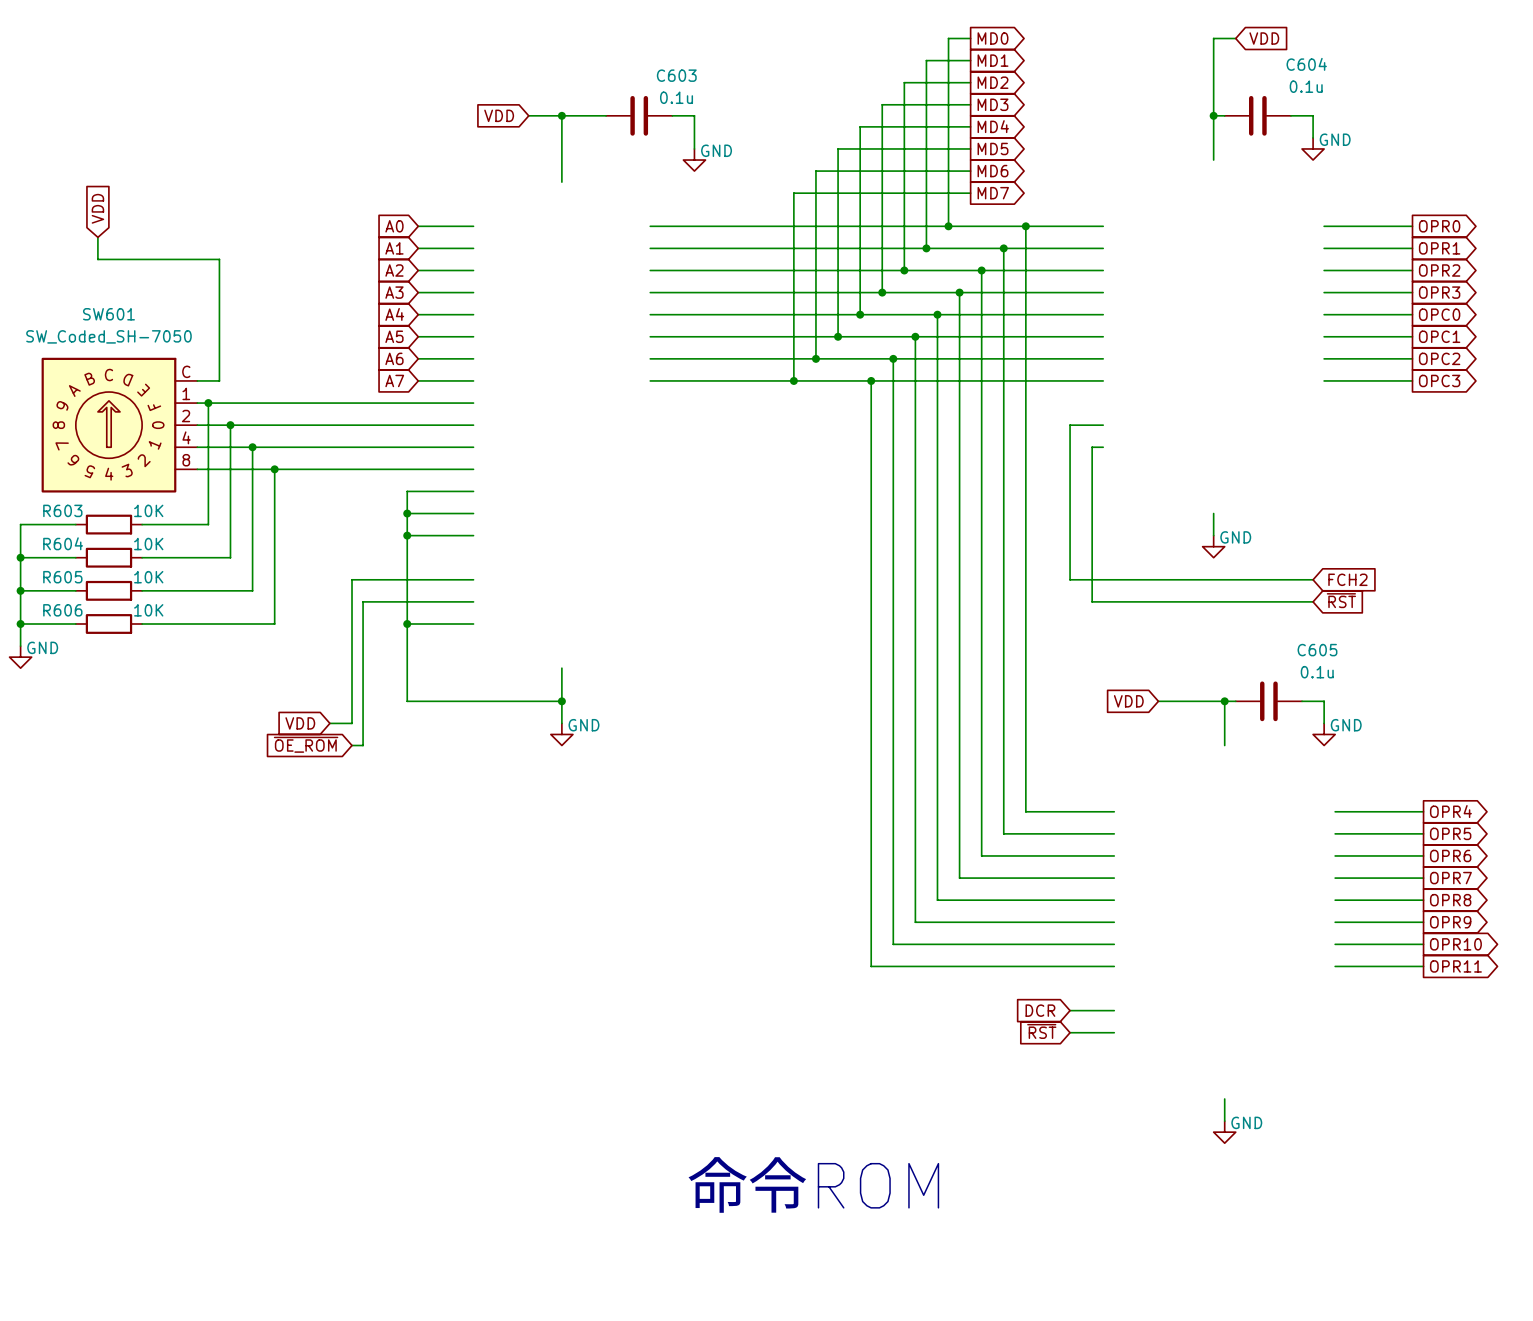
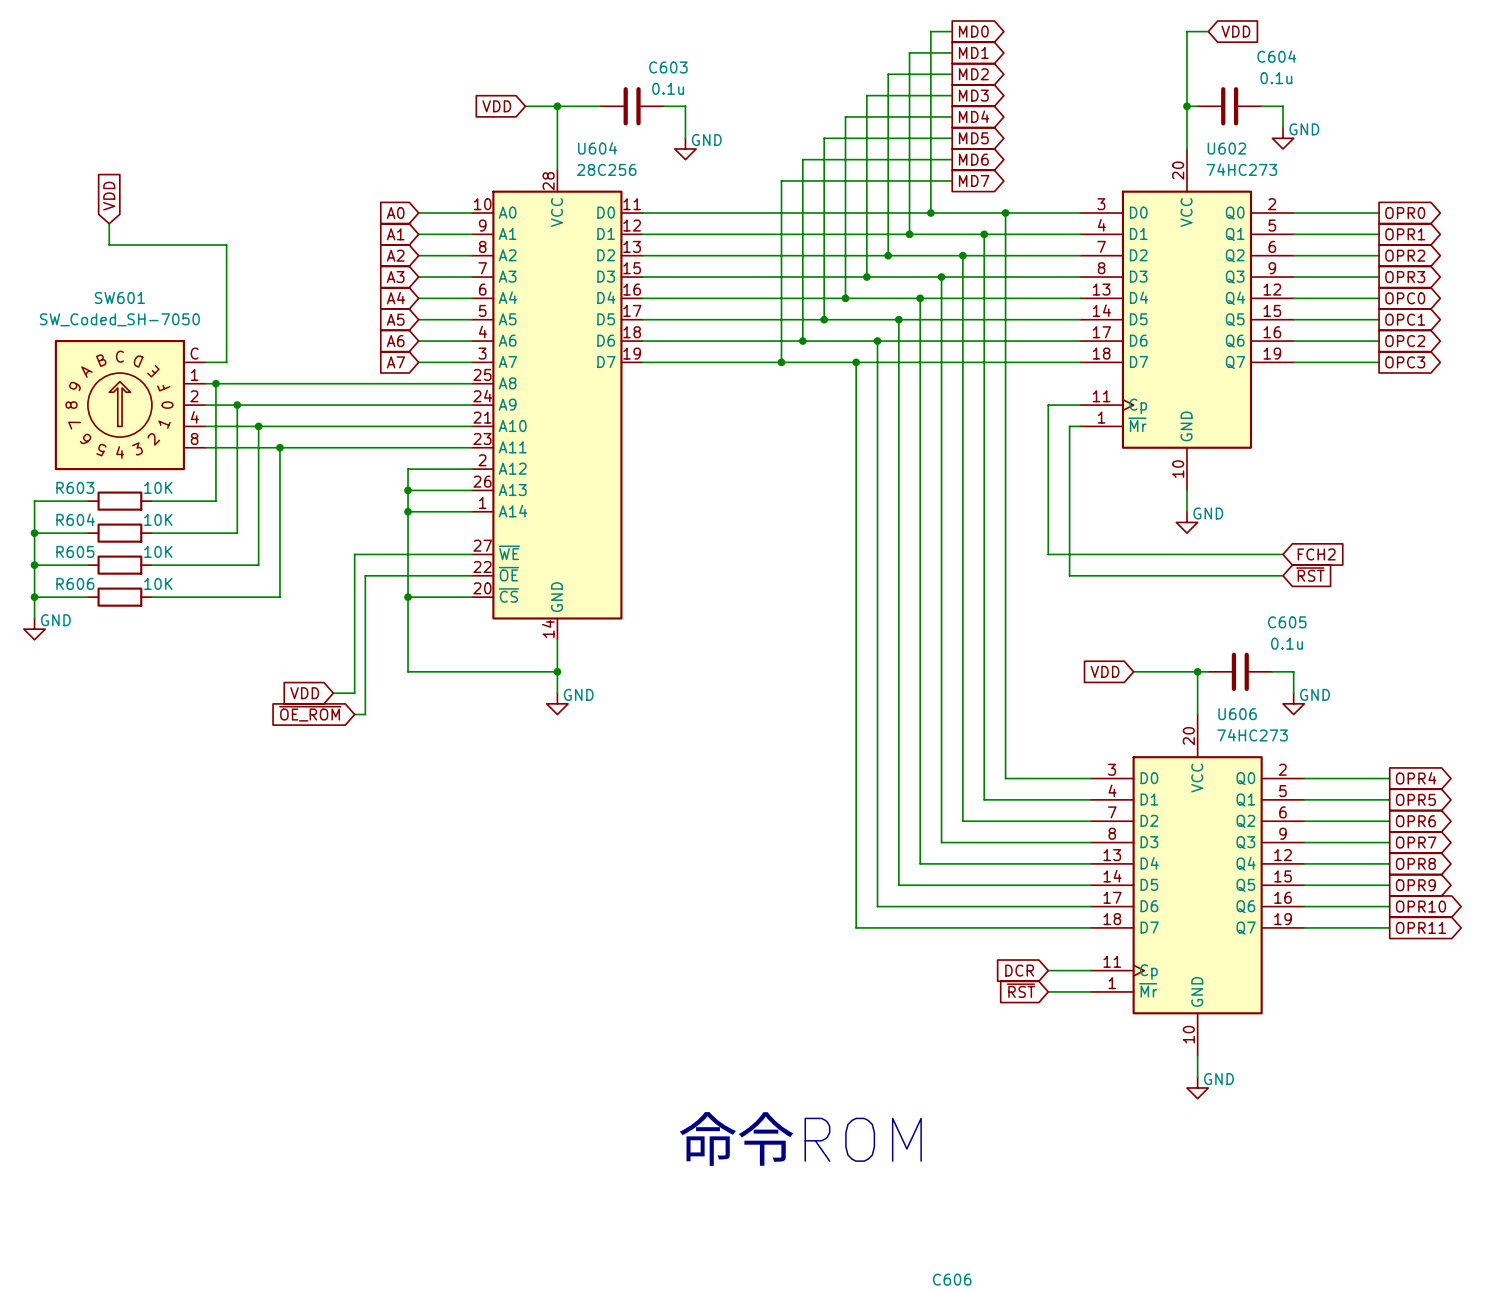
U602: none -> 74HC273 (1186, 319)
U604: none -> 28C256 (557, 405)
U606: none -> 74HC273 (1197, 885)

